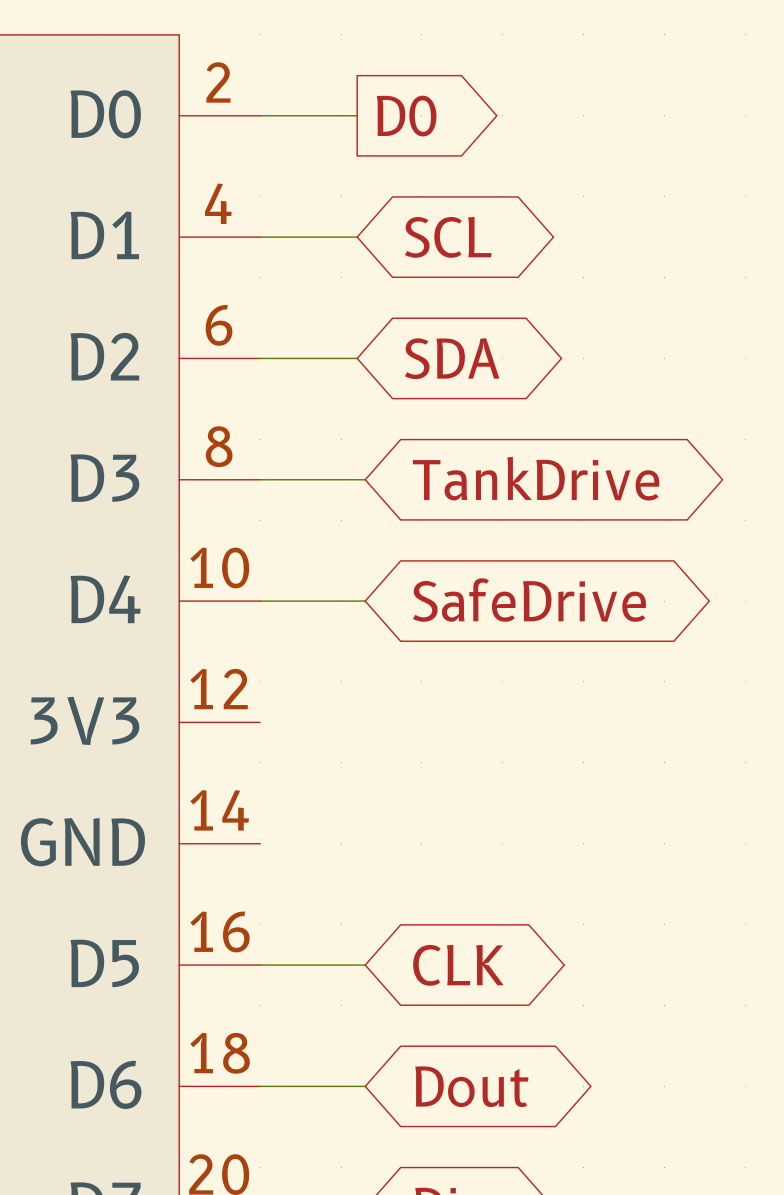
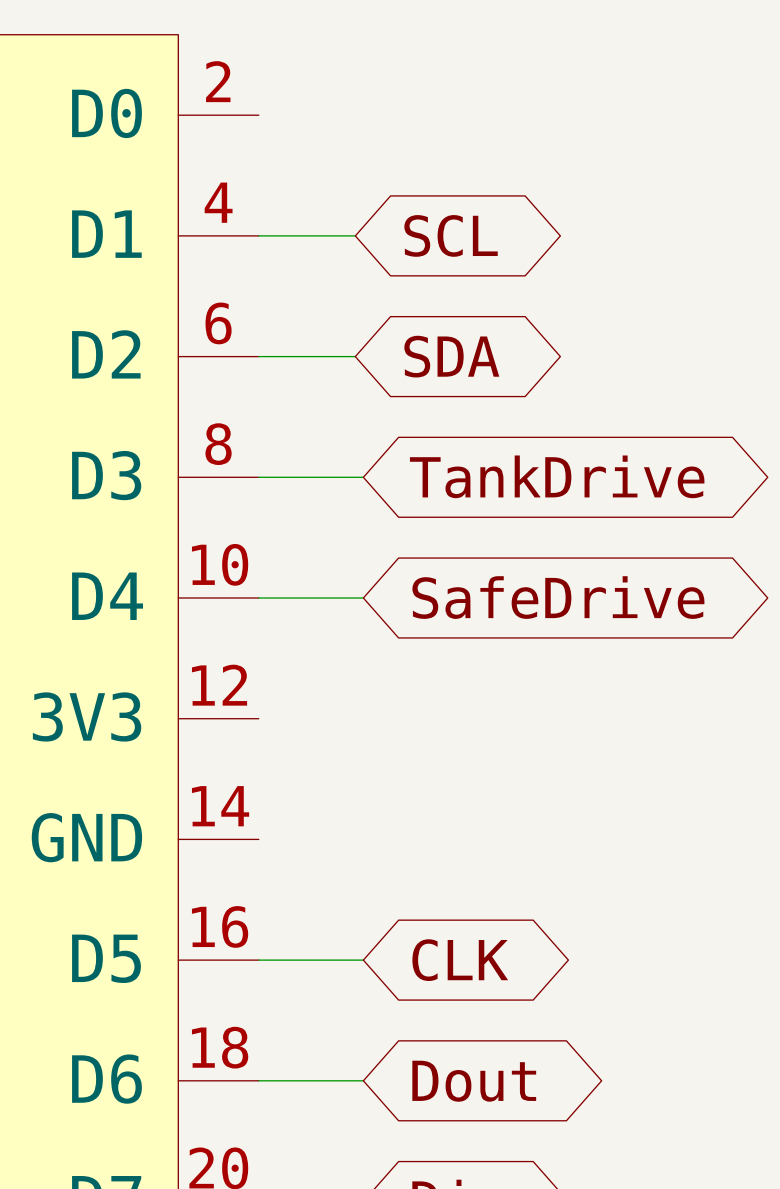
wire: (260, 115) (357, 115) -> none
global label: D0 (406, 116) -> none

